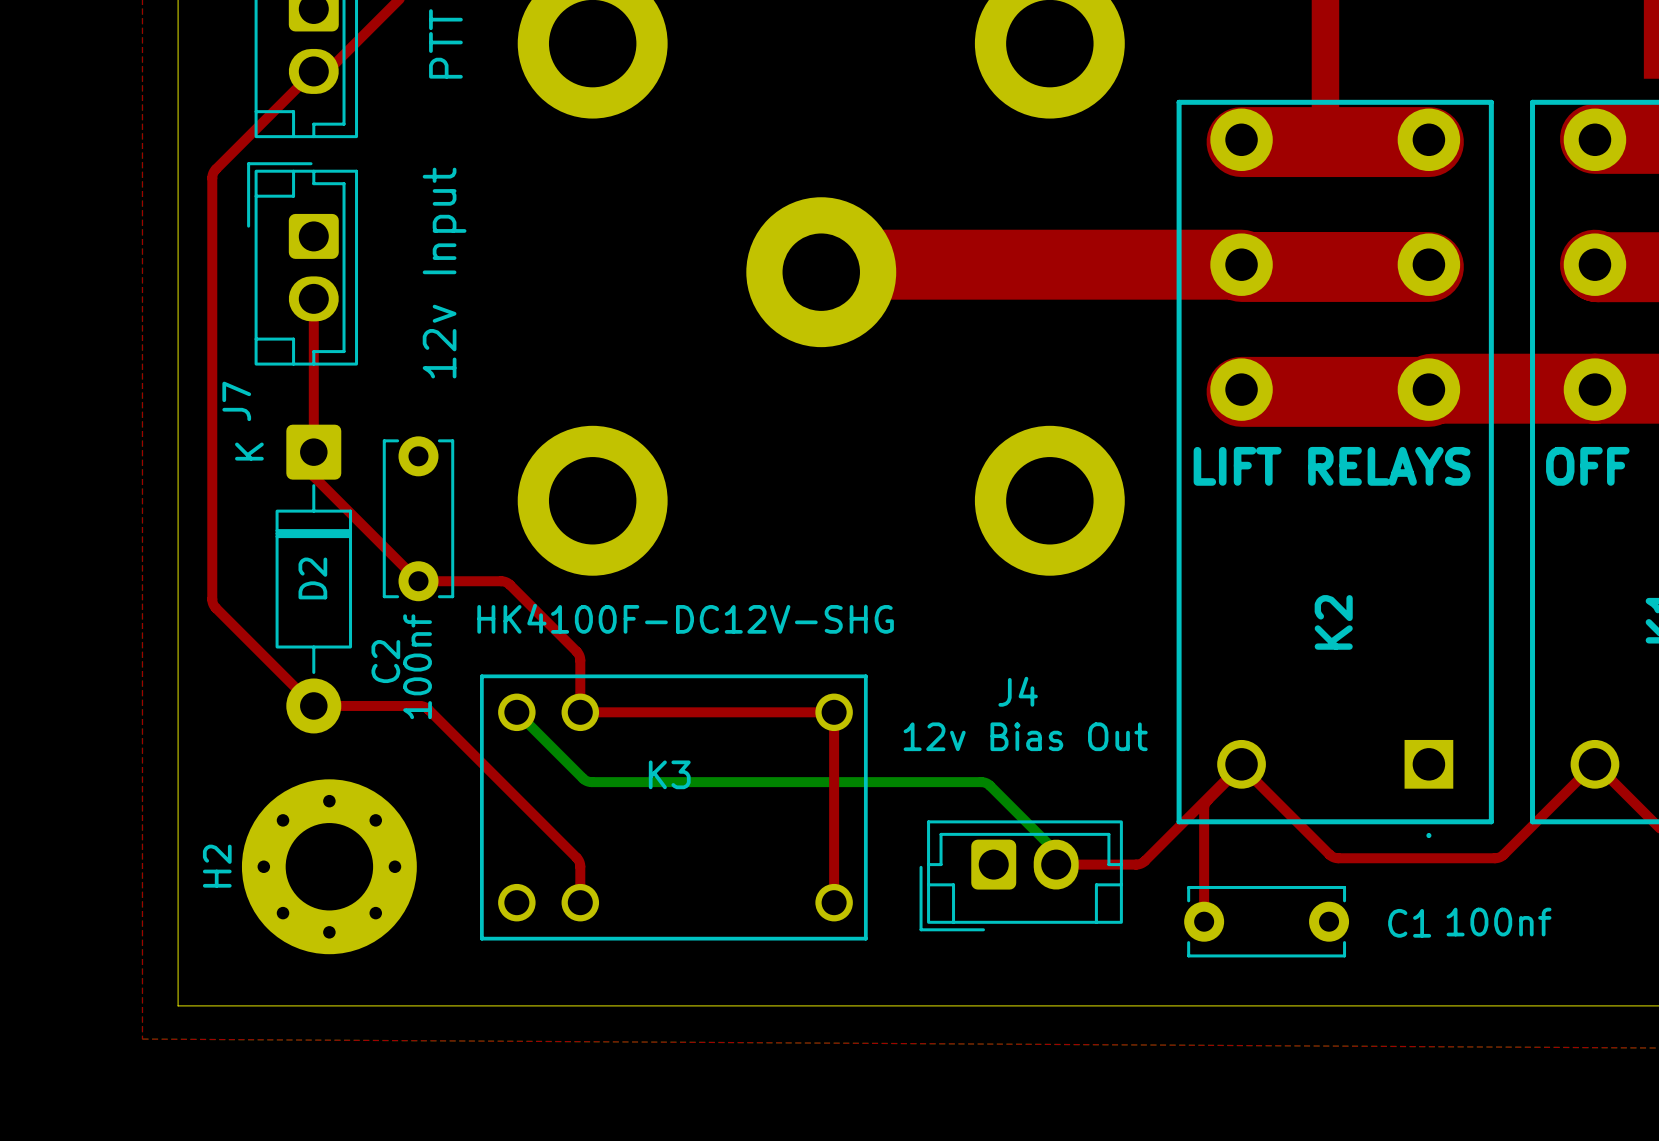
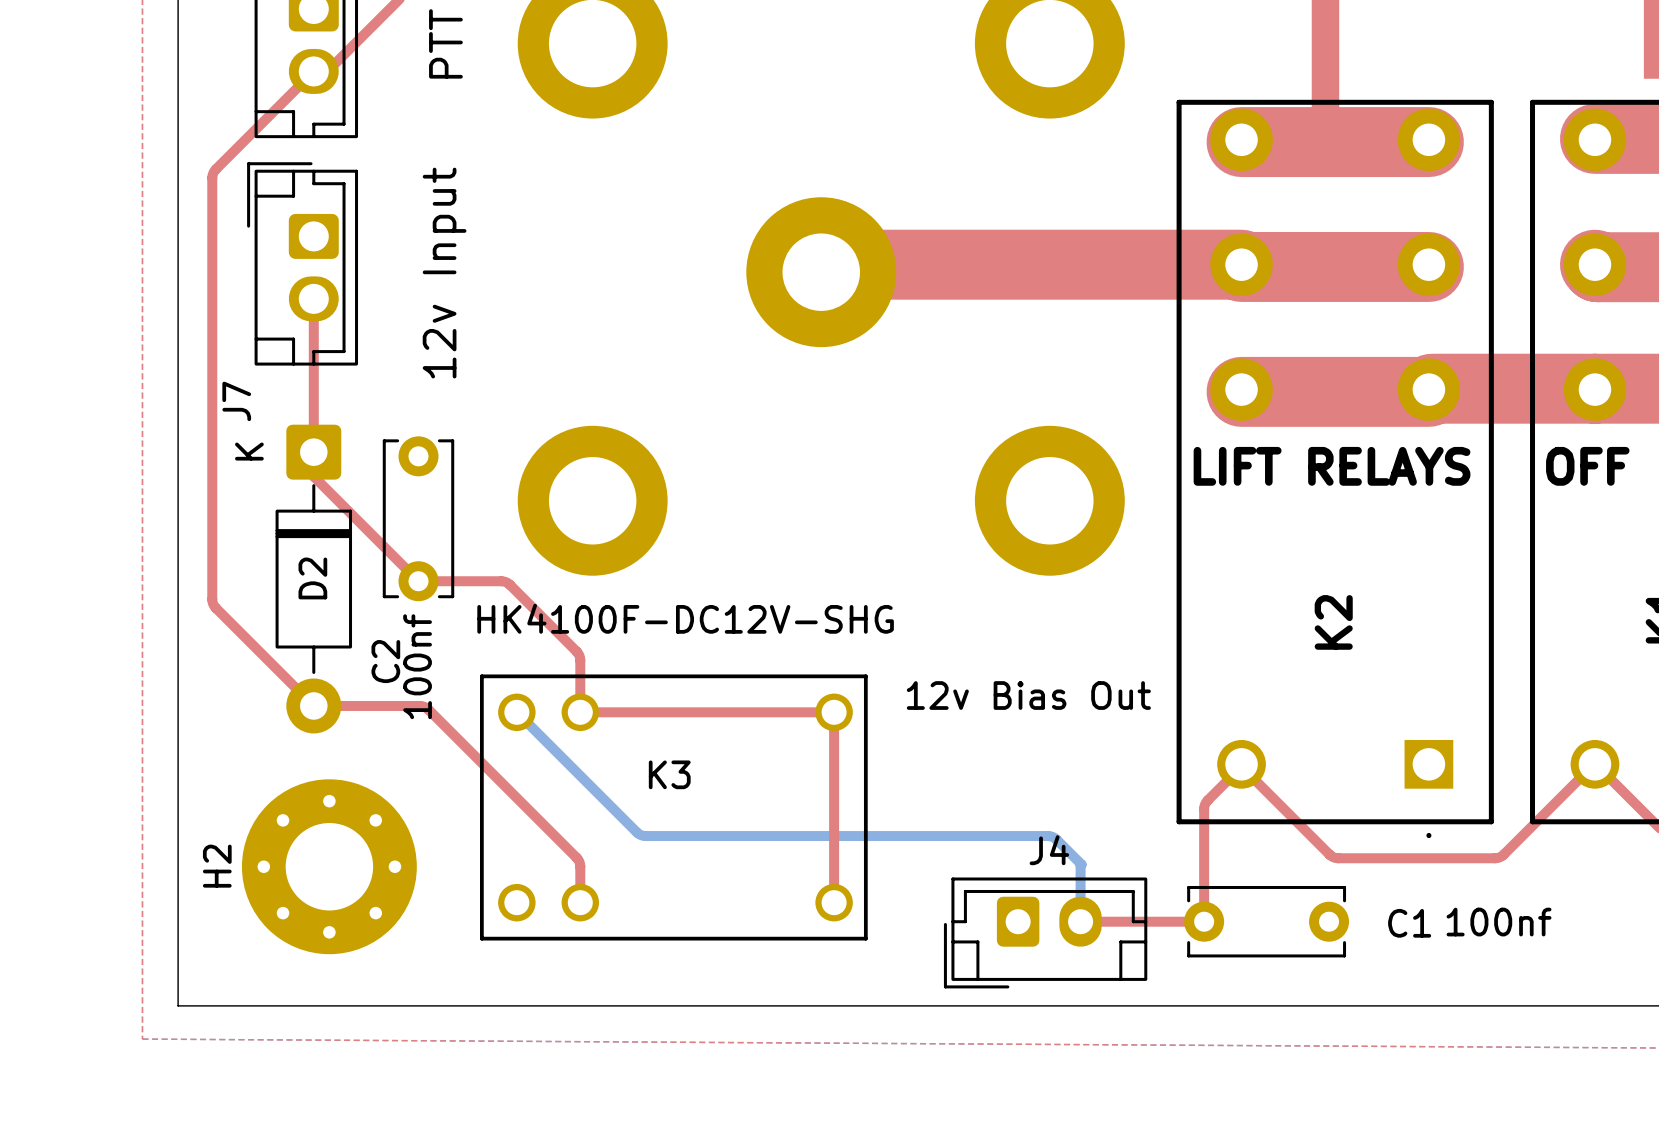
J4 name position: J4 (1018, 691) -> J4 (1049, 850)
J4 value position: 12v Bias Out (1025, 736) -> 12v Bias Out (1028, 695)
top track: (1241, 764) (1141, 863) (1056, 864) -> none
bottom track: (582, 778) (591, 782) (983, 782) (990, 785) (1056, 851) (1056, 864) -> (582, 778) (636, 832) (644, 835) (1051, 836) (1081, 864) (1080, 921)
J4 footprint: [919, 820, 1123, 932] -> [943, 877, 1148, 989]
top track: none -> (1080, 921) (1204, 921)

